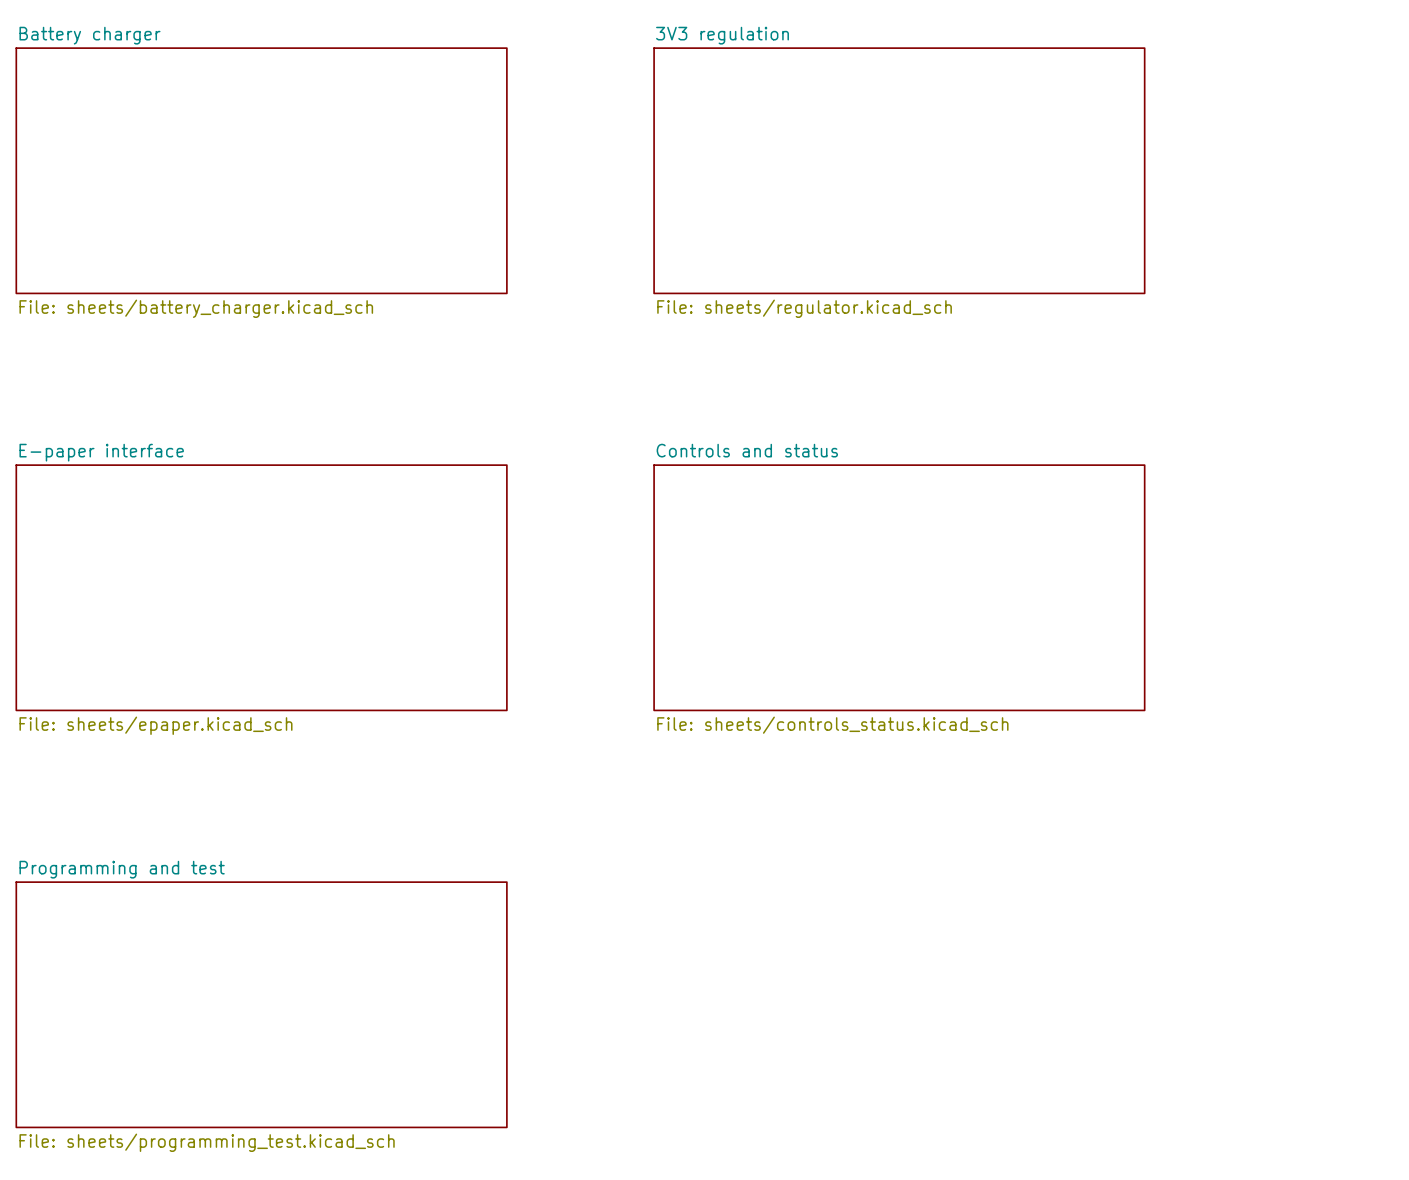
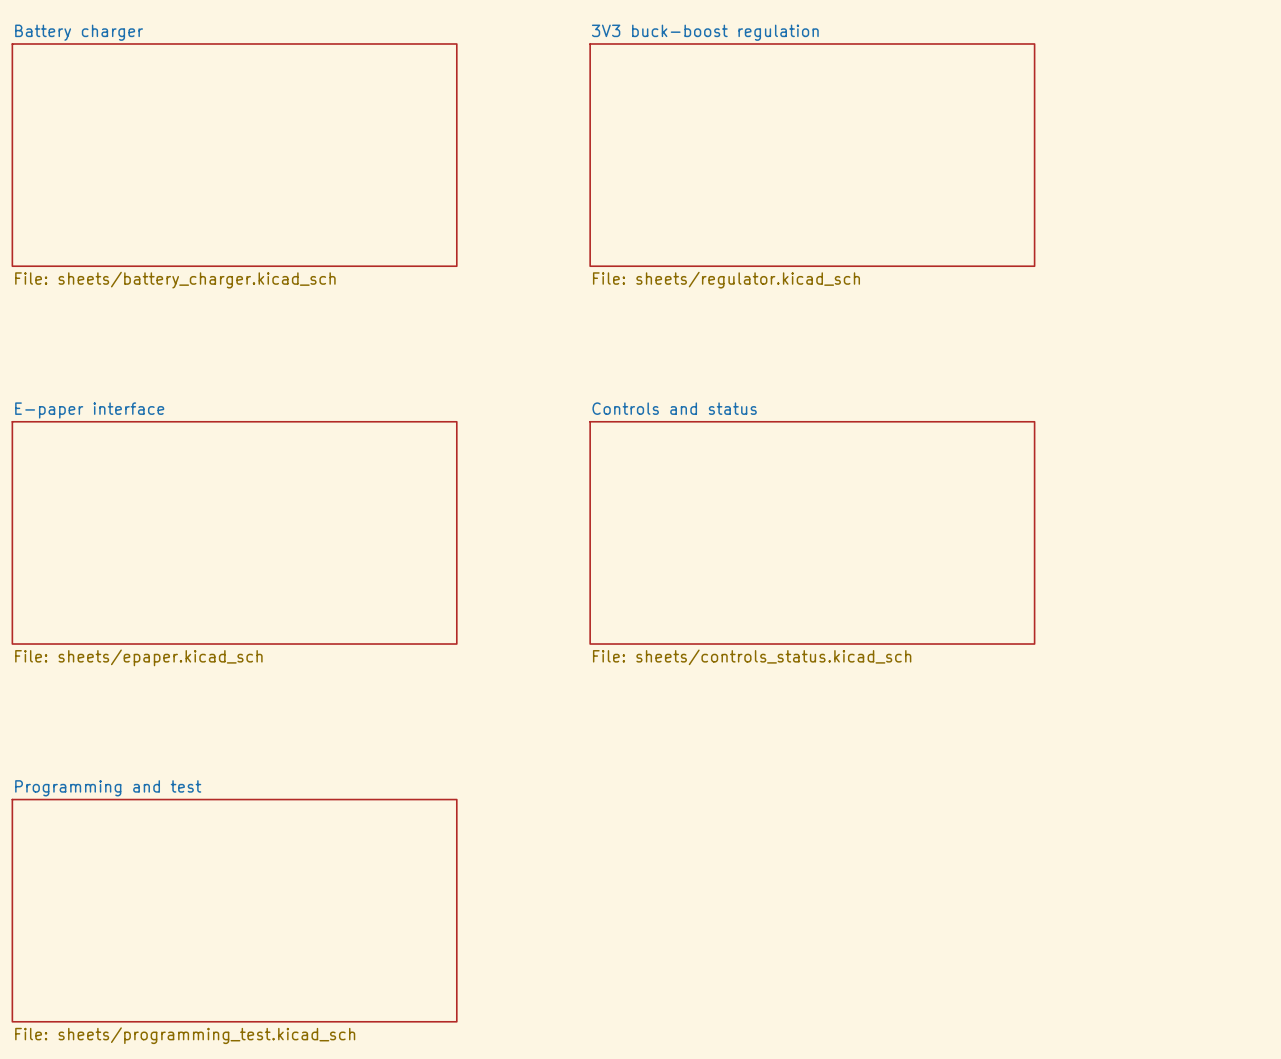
sheet 3V3 regulation name: 3V3 regulation (722, 35) -> 3V3 buck-boost regulation (705, 32)

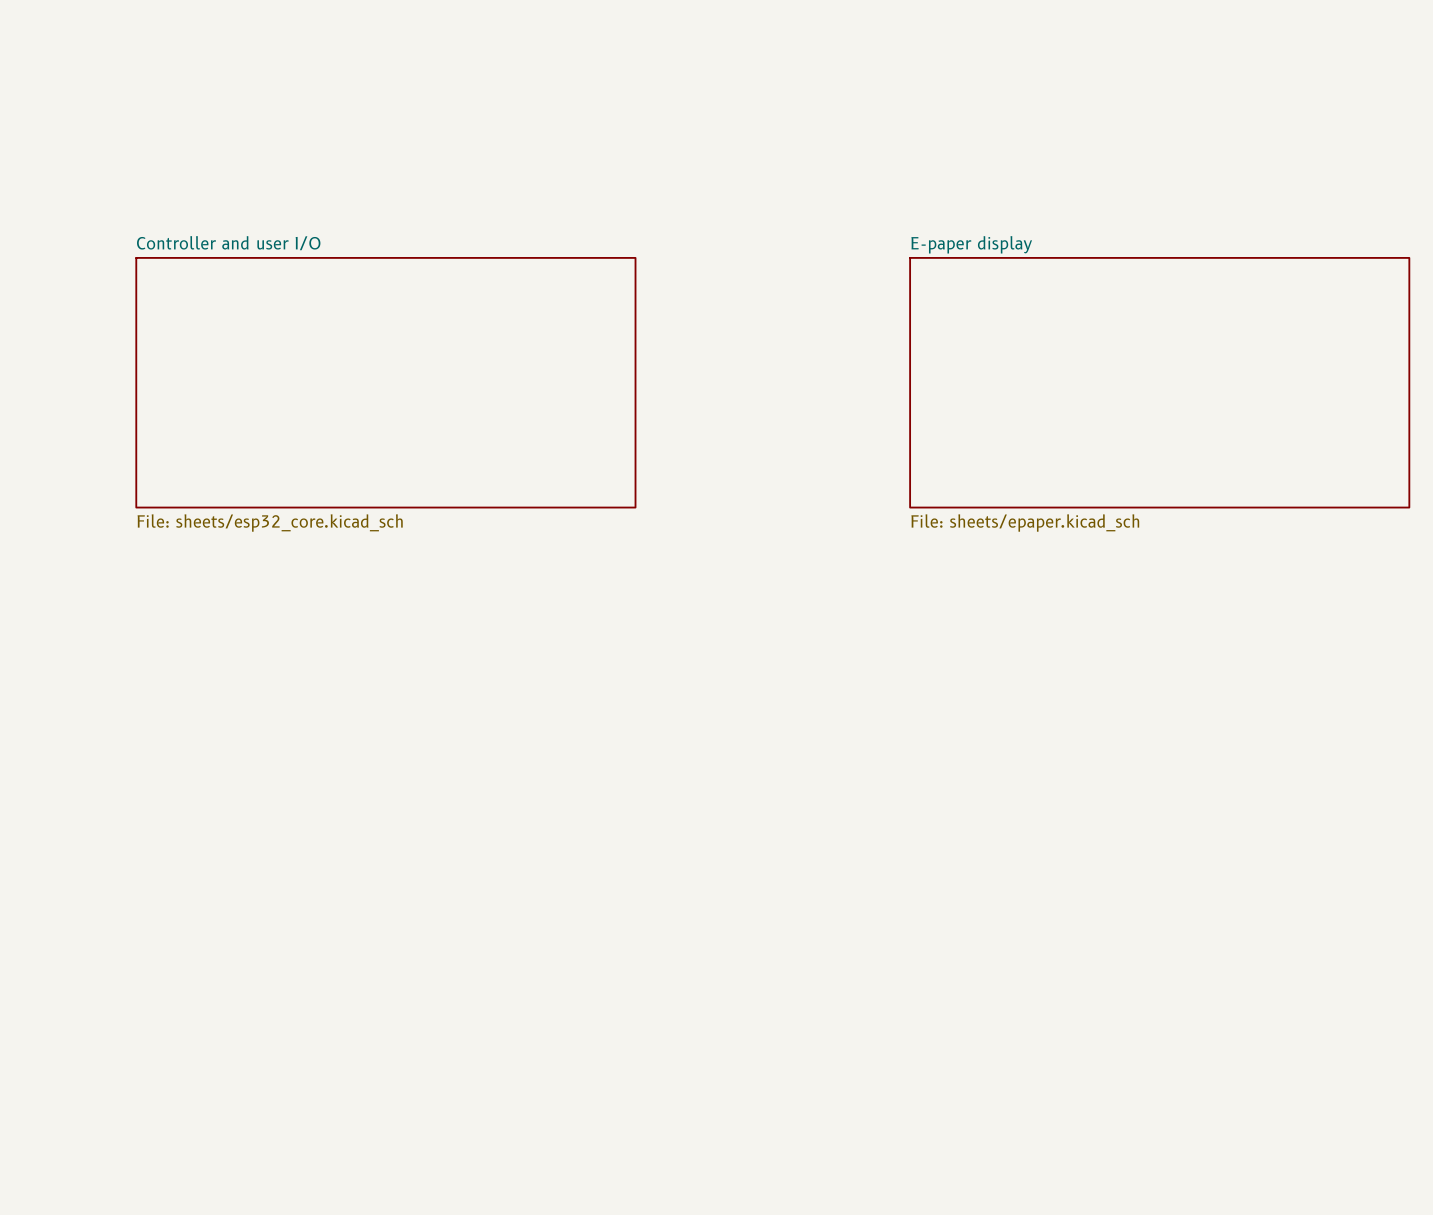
sheet Battery charger: File: sheets/battery_charger.kicad_sch (234, 155) -> none
sheet 3V3 buck-boost regulation: File: sheets/regulator.kicad_sch (812, 155) -> none
sheet Controller and user I/O: none -> File: sheets/esp32_core.kicad_sch (385, 382)
sheet E-paper display: none -> File: sheets/epaper.kicad_sch (1159, 382)
sheet E-paper interface: File: sheets/epaper.kicad_sch (234, 532) -> none
sheet Controls and status: File: sheets/controls_status.kicad_sch (812, 532) -> none
sheet Programming and test: File: sheets/programming_test.kicad_sch (234, 910) -> none

